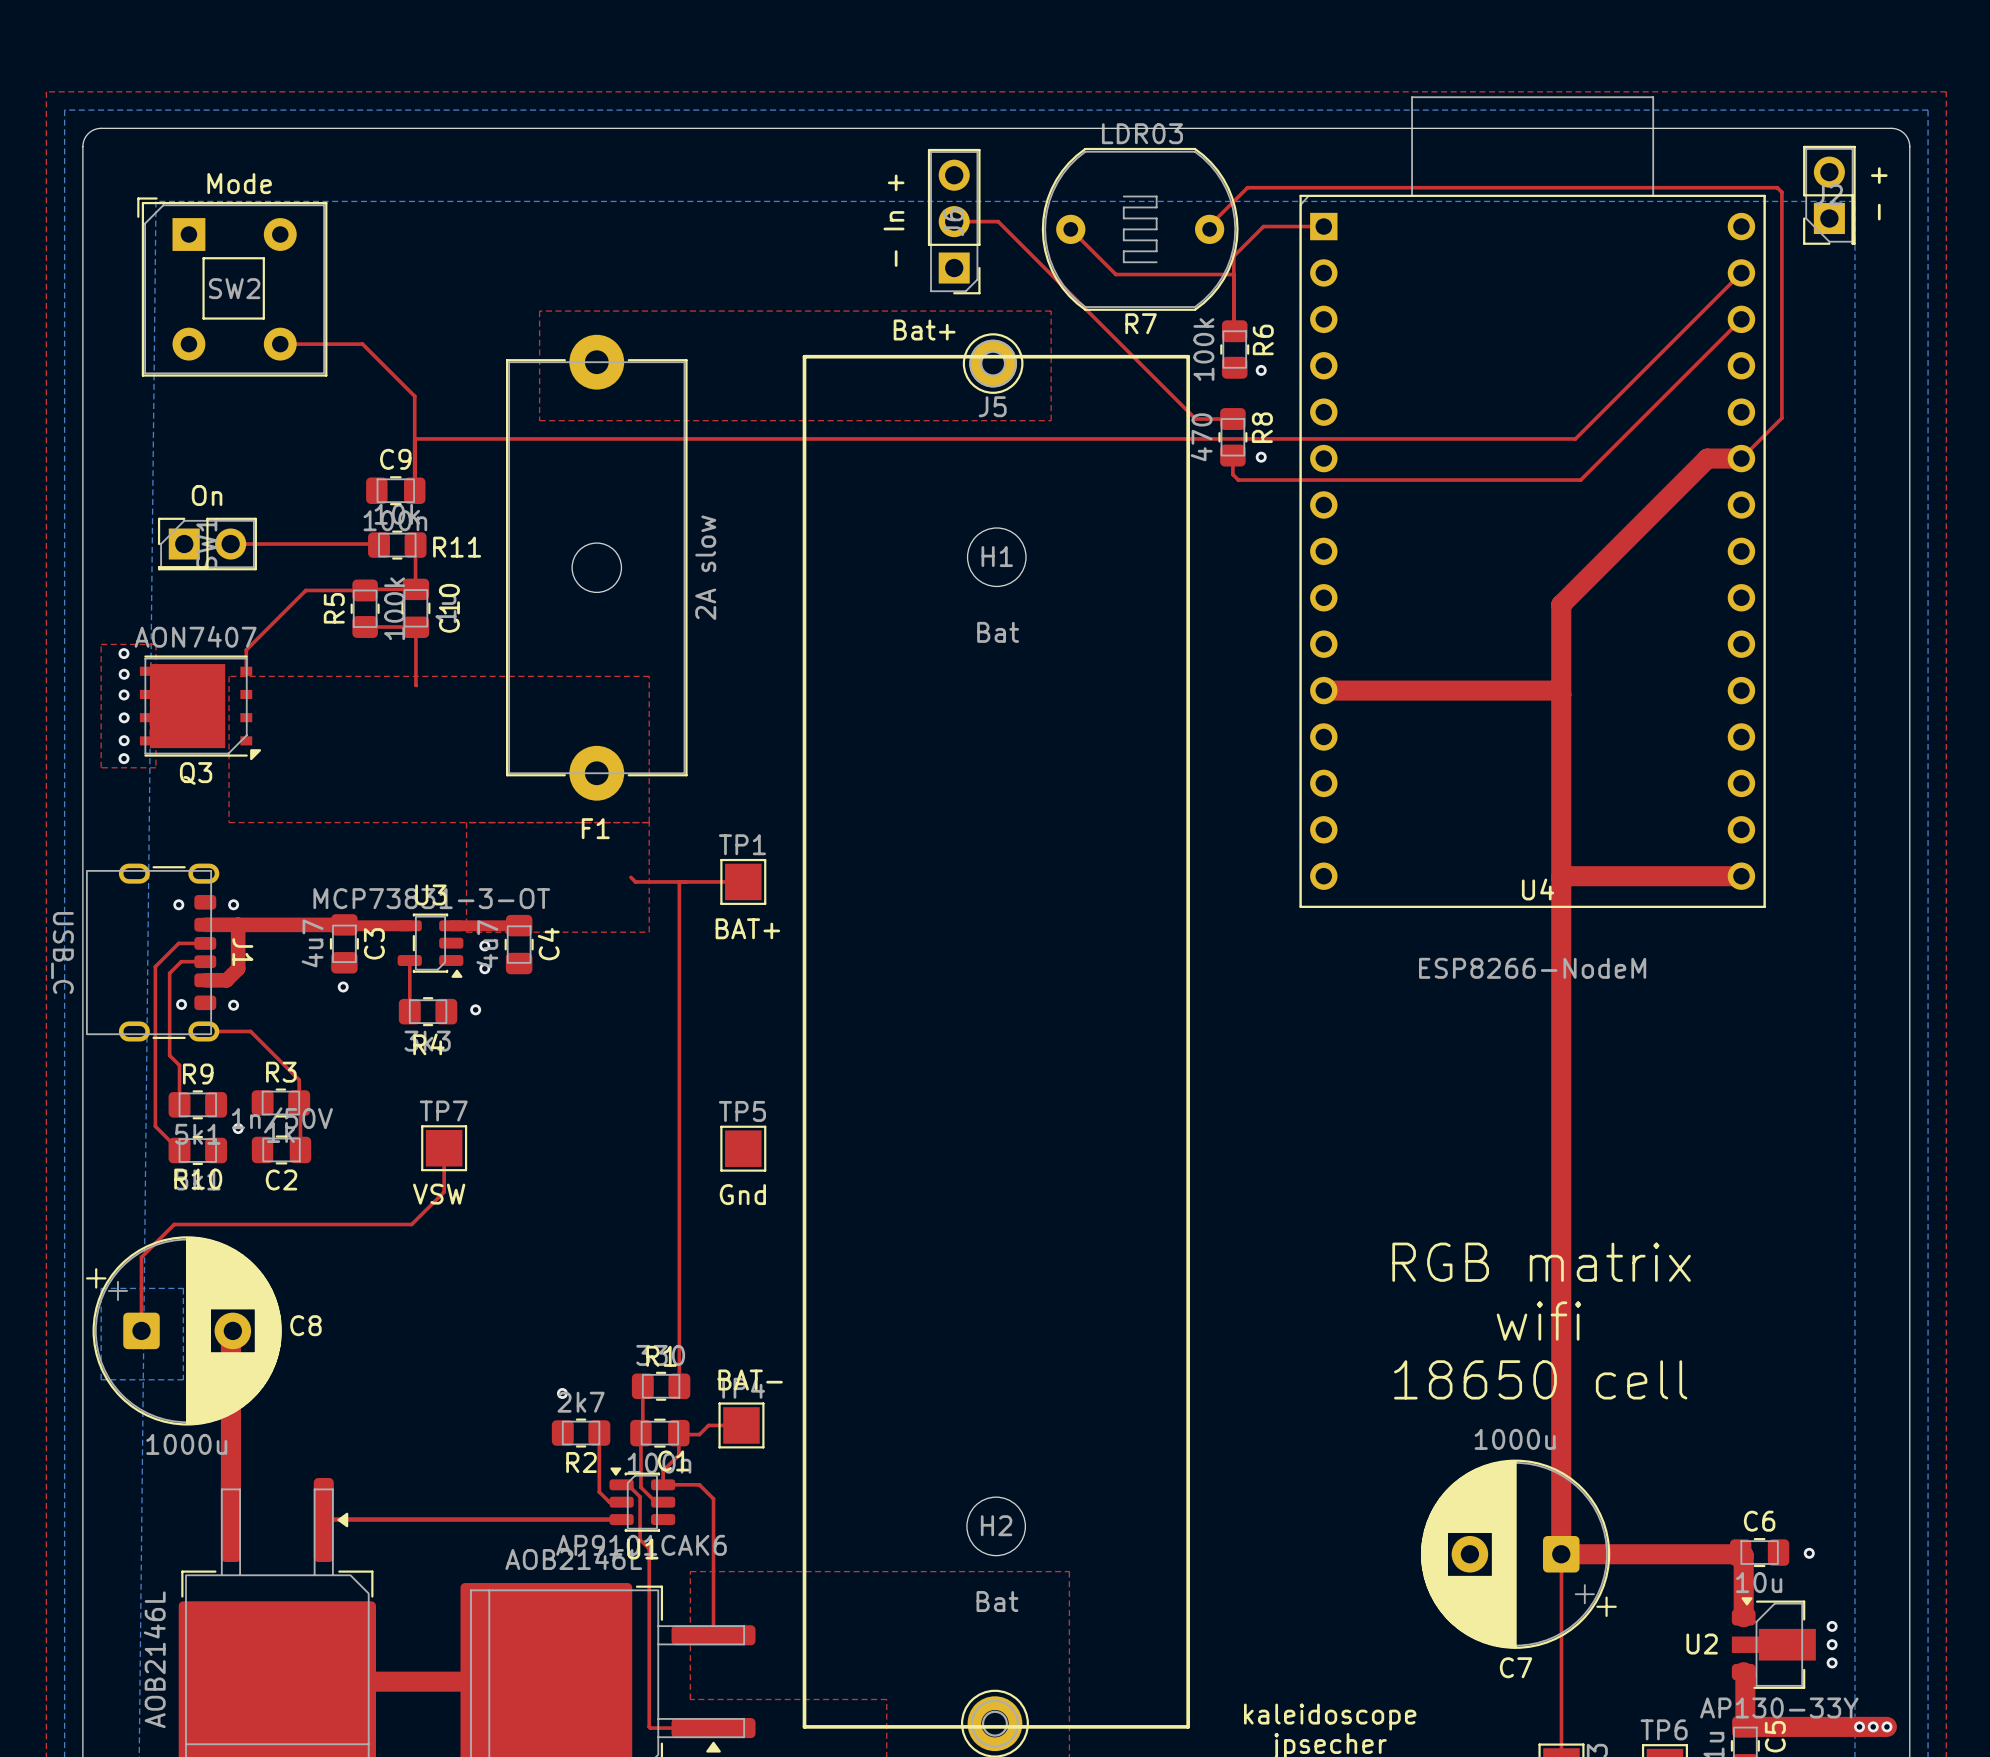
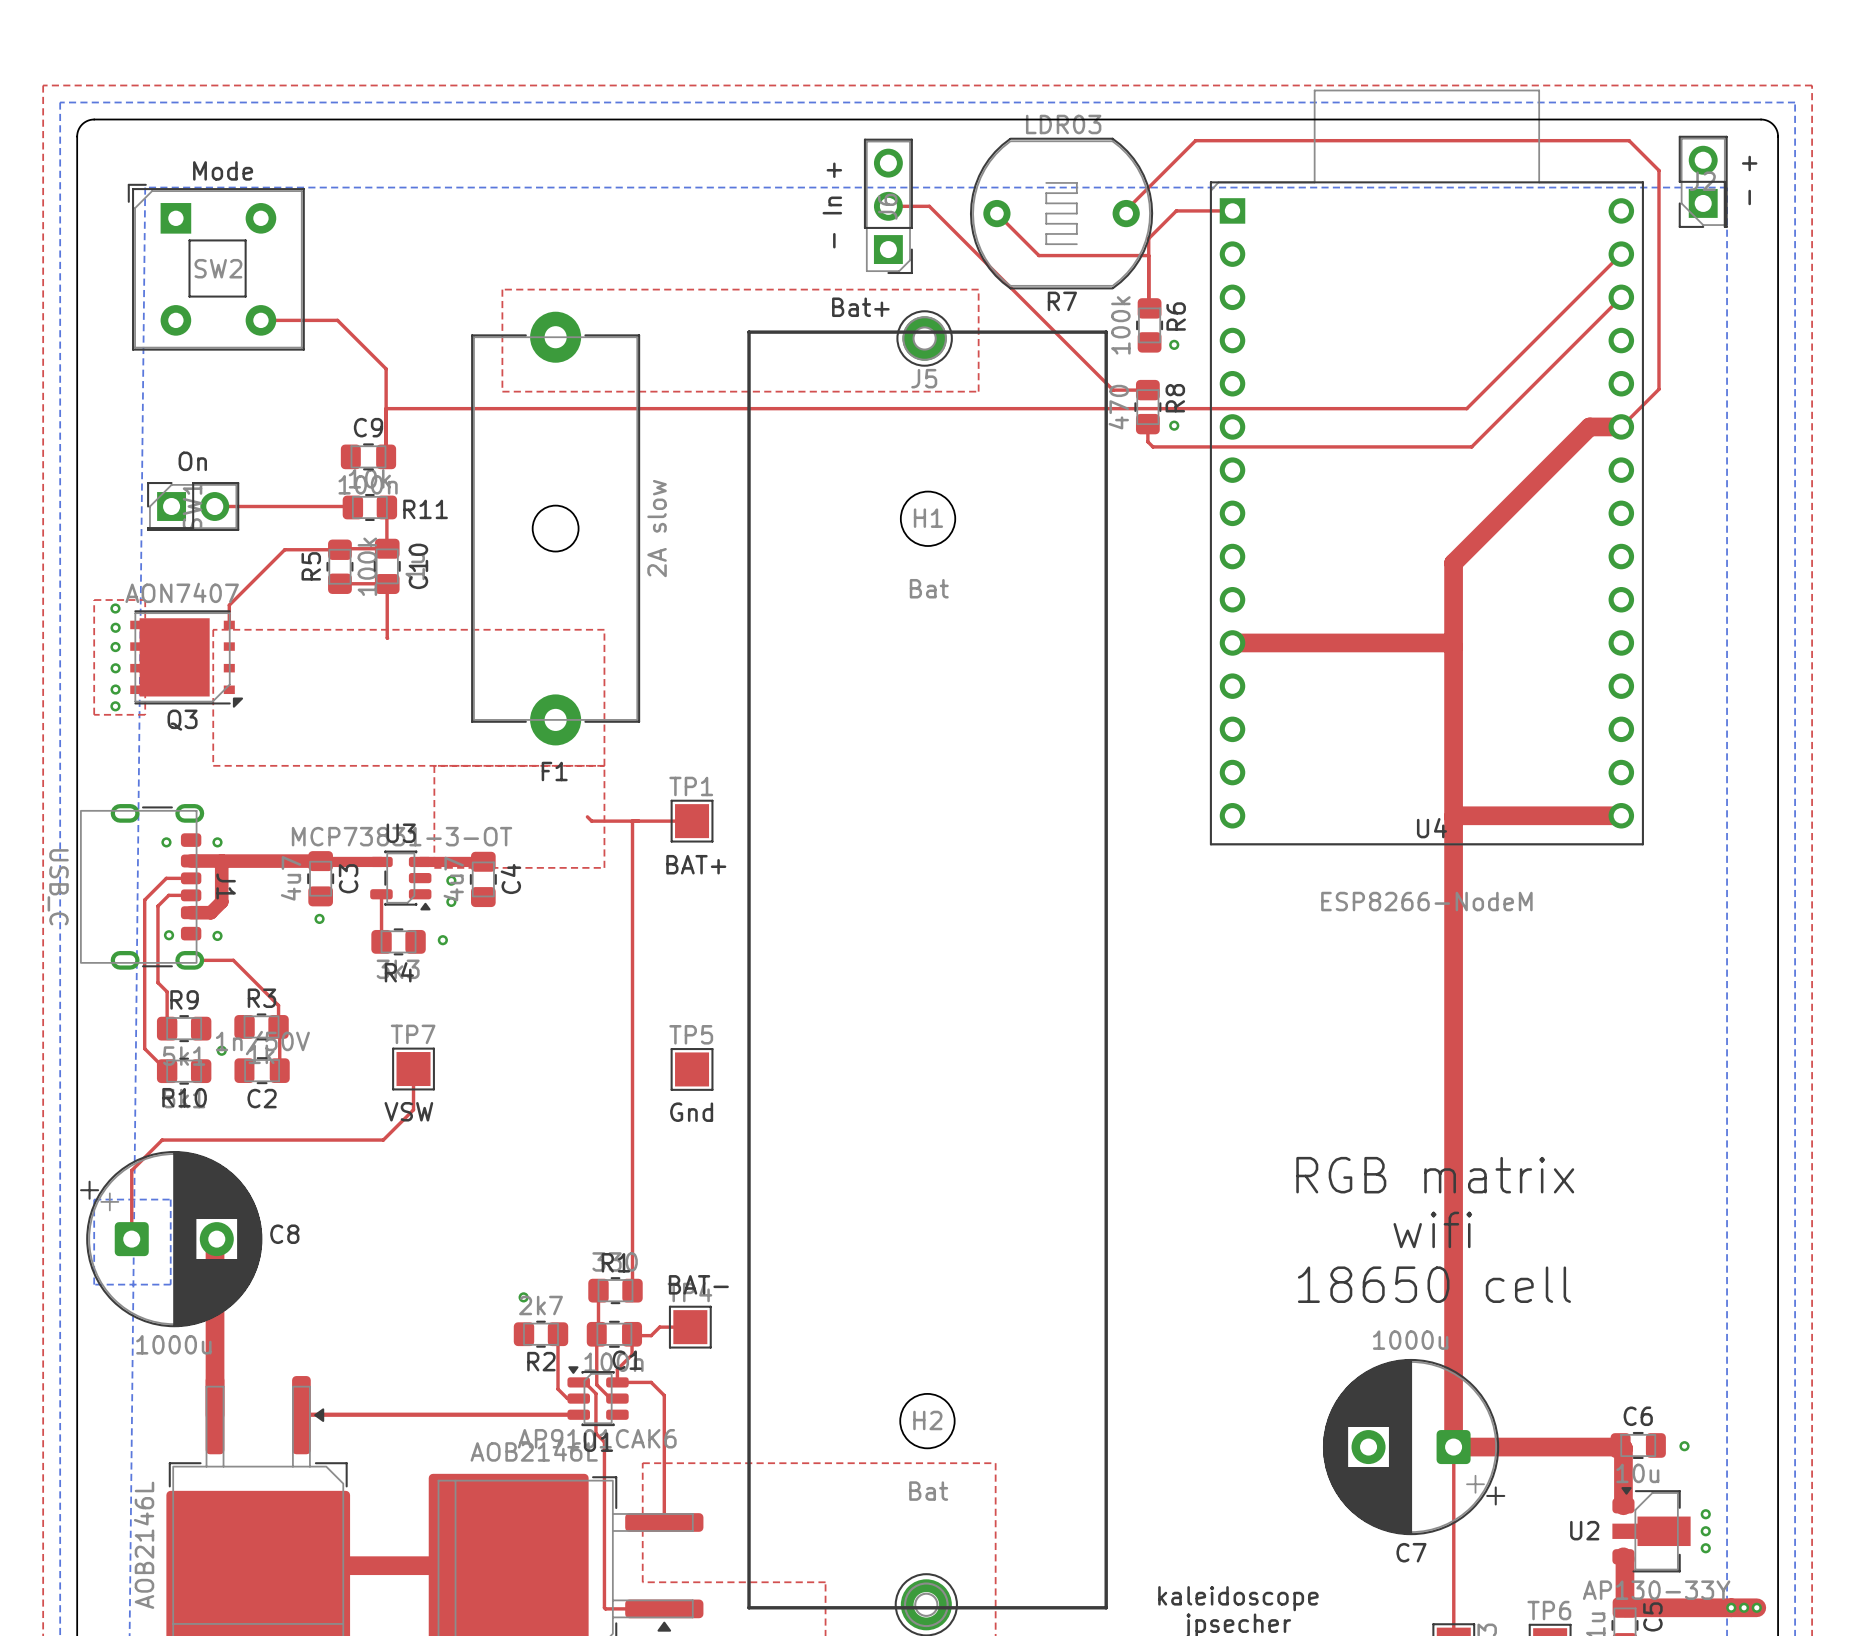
top track: (1247, 187) (1777, 187) (1781, 192) -> (1161, 174) (1195, 140) (1629, 140) (1658, 170) (1658, 179)

